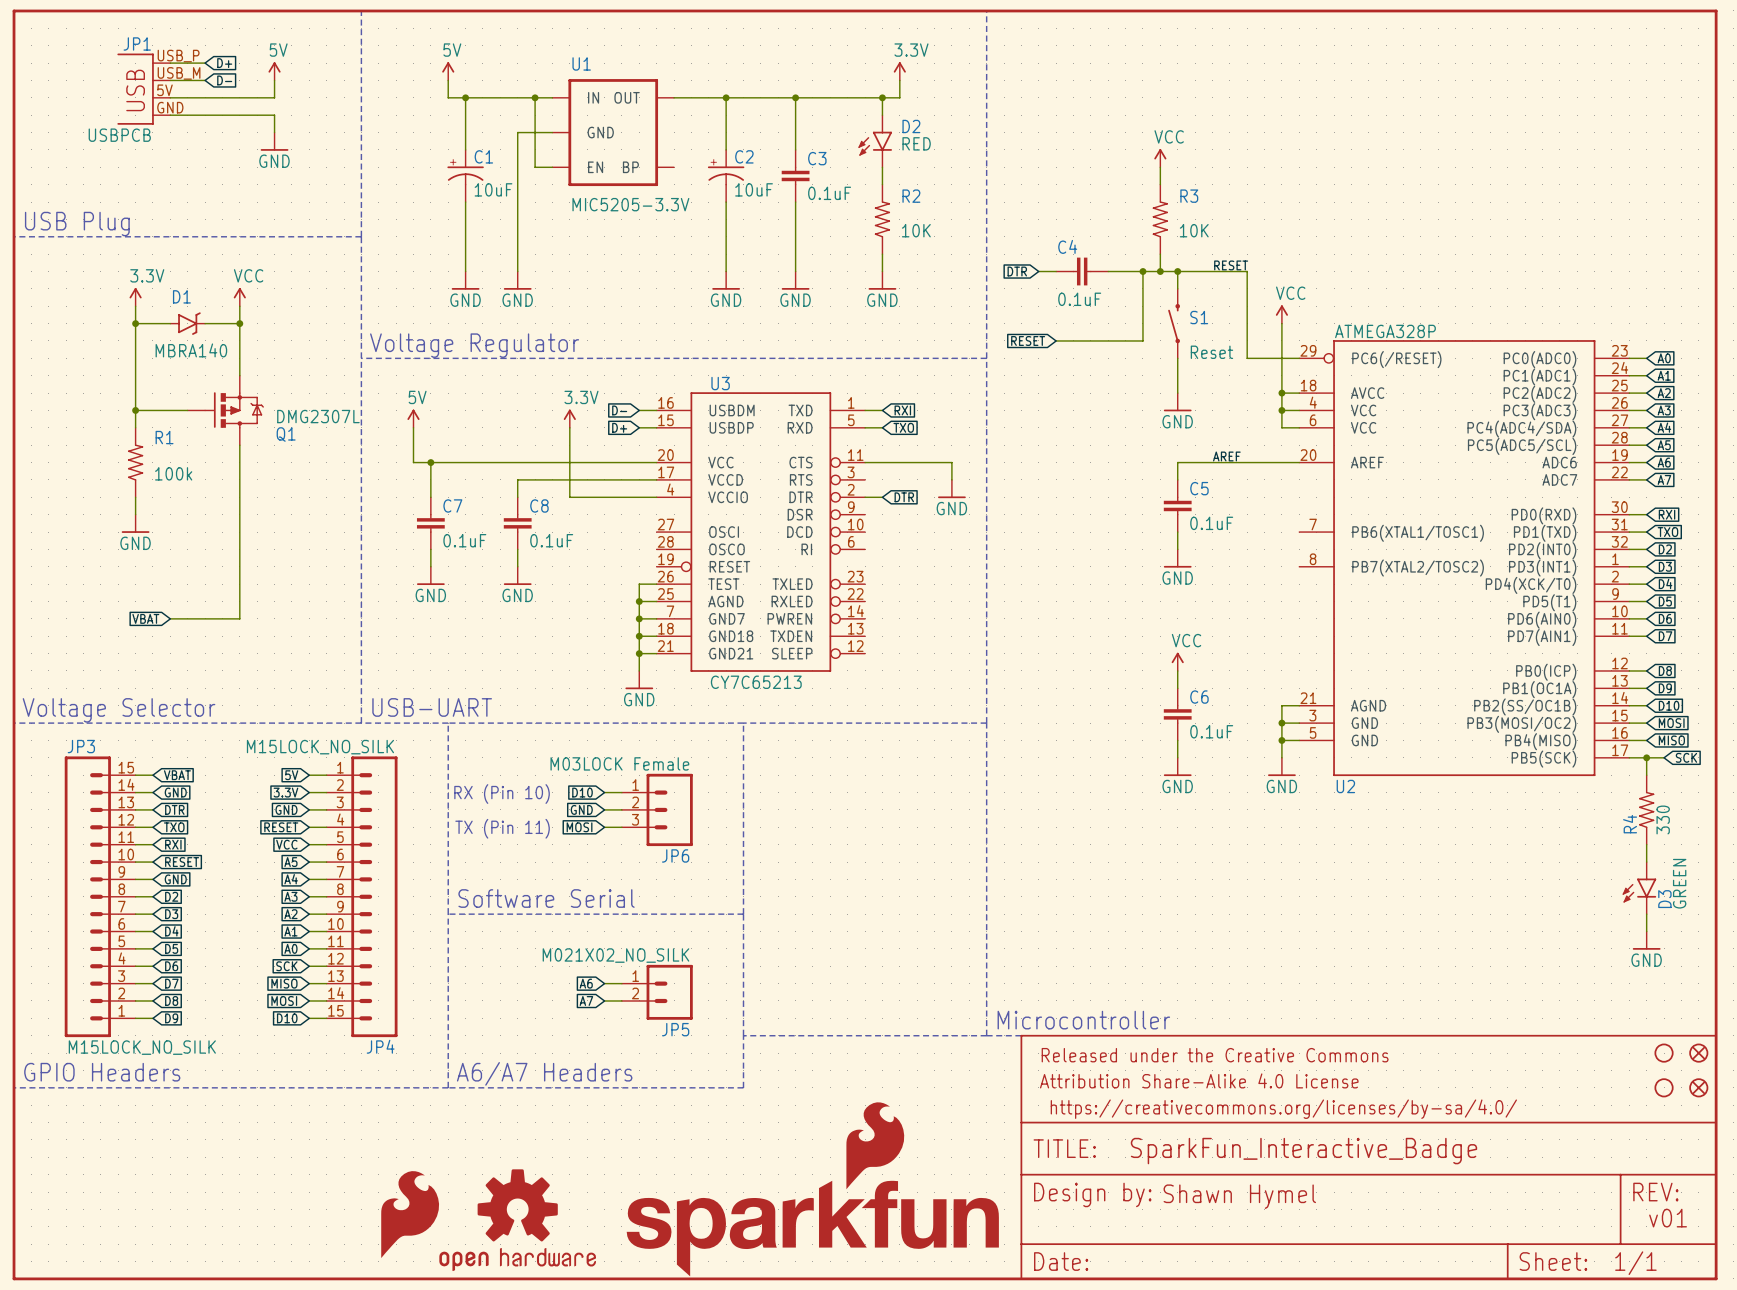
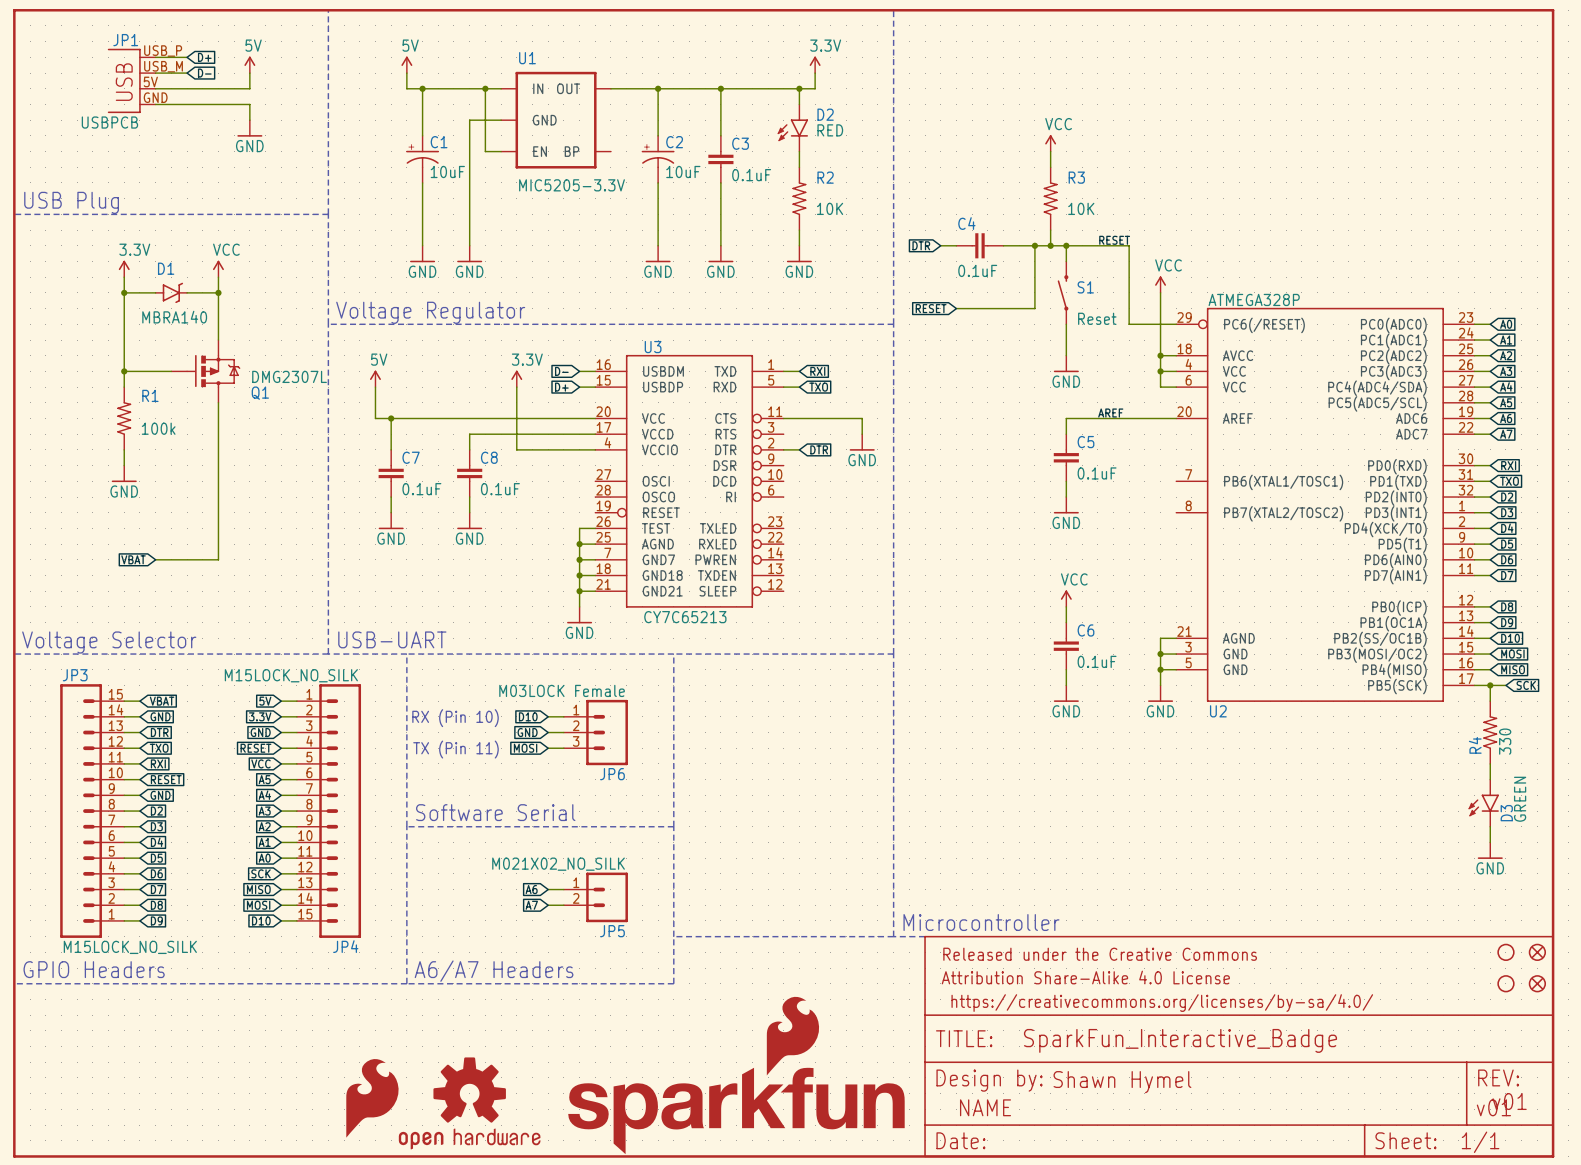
part text: none -> NAME (985, 1107)
part text: none -> v01 (1493, 1107)

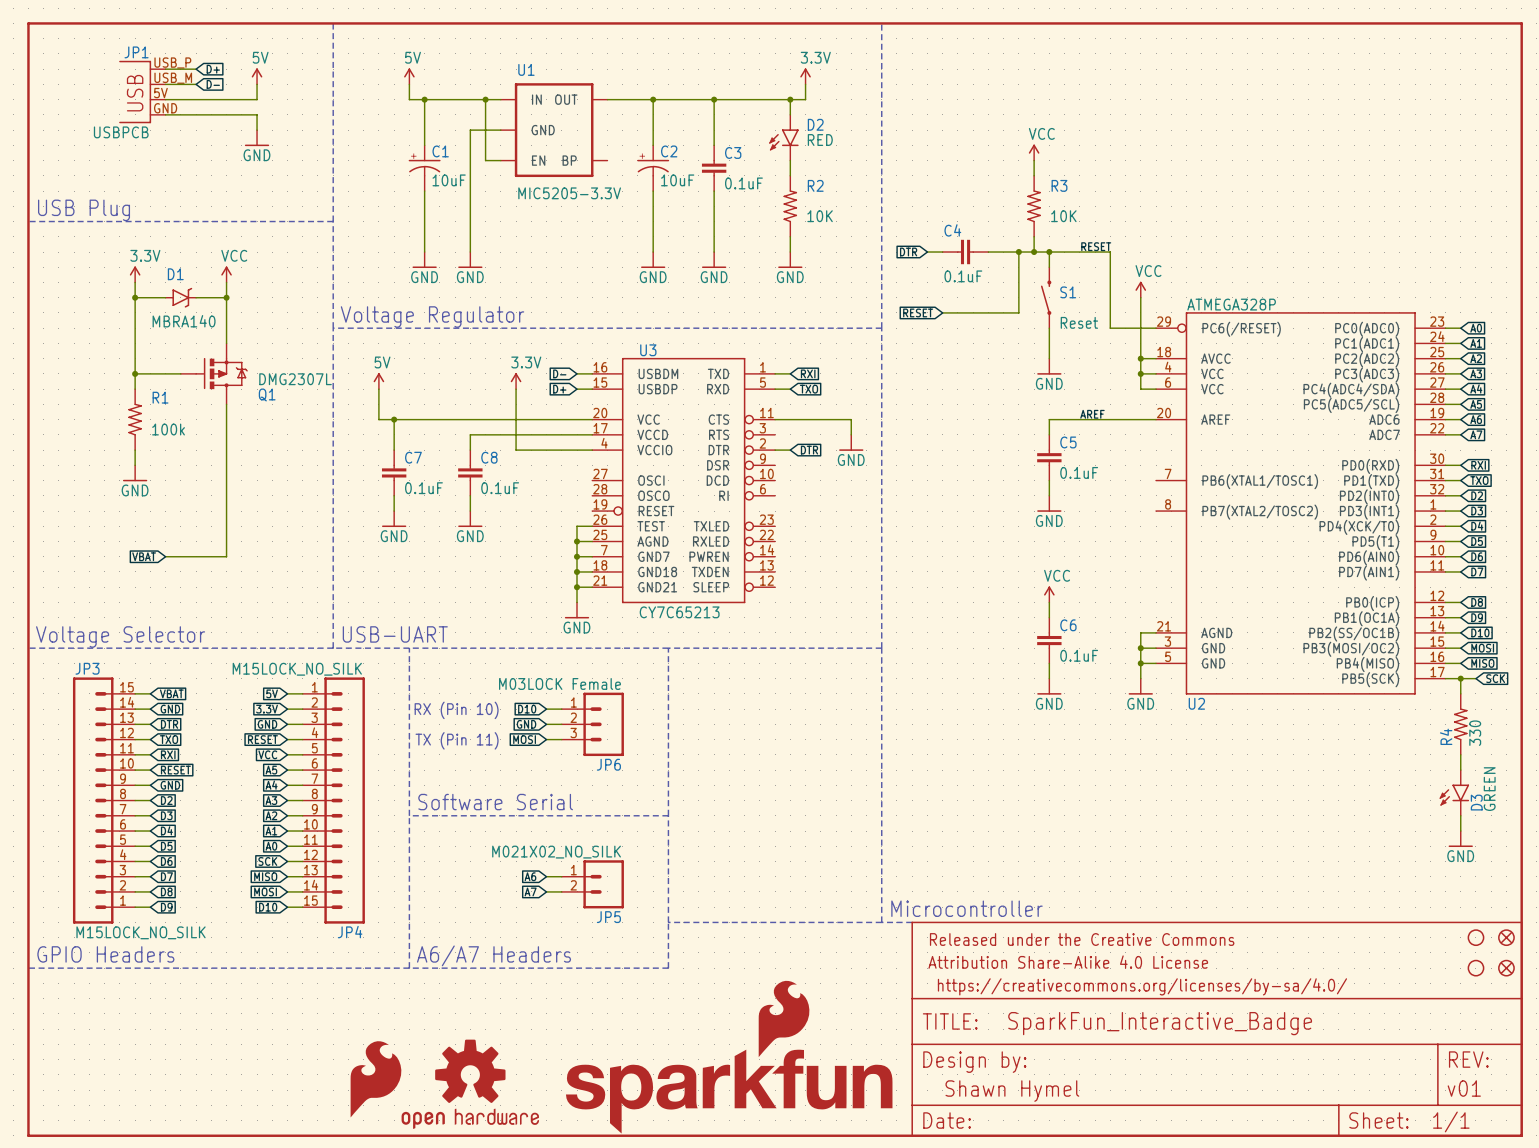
text: Shawn Hymel (1122, 1082) -> none
text: v01 (1509, 1101) -> none
part text: NAME (985, 1107) -> Shawn Hymel (1012, 1091)

